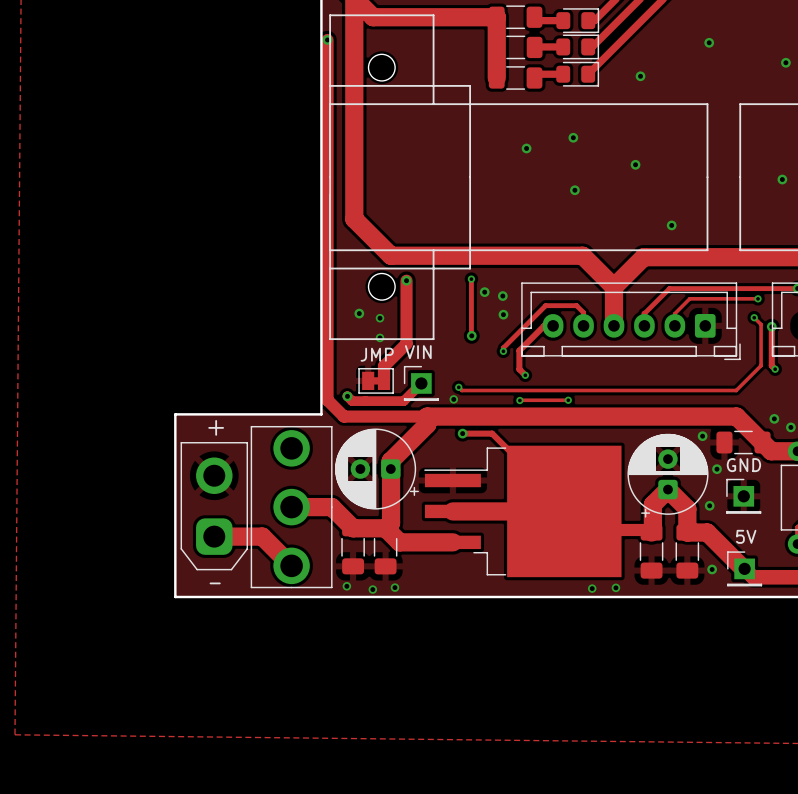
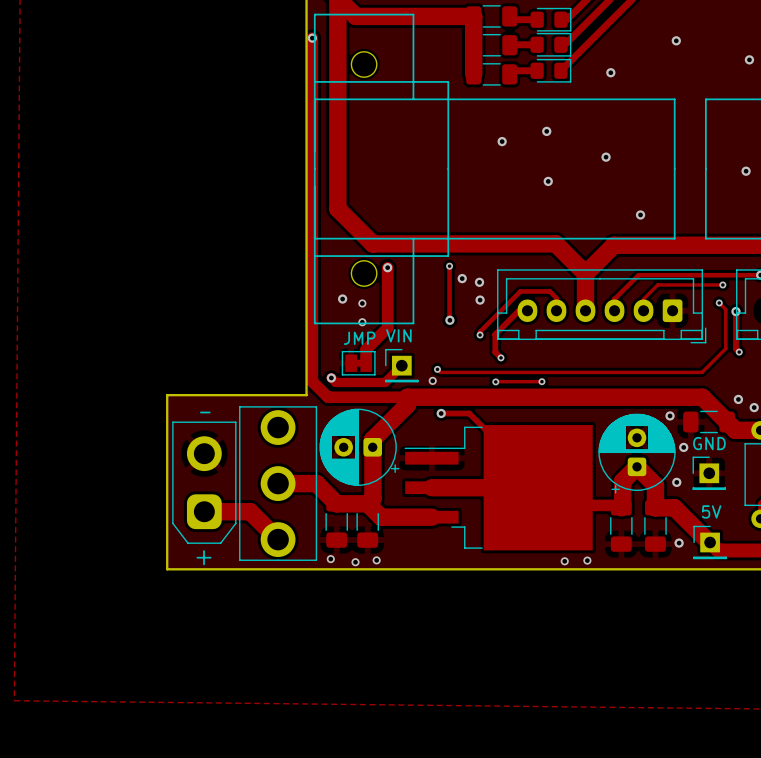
part text position: + (216, 427) -> + (204, 557)
text position: - (215, 583) -> - (205, 412)

